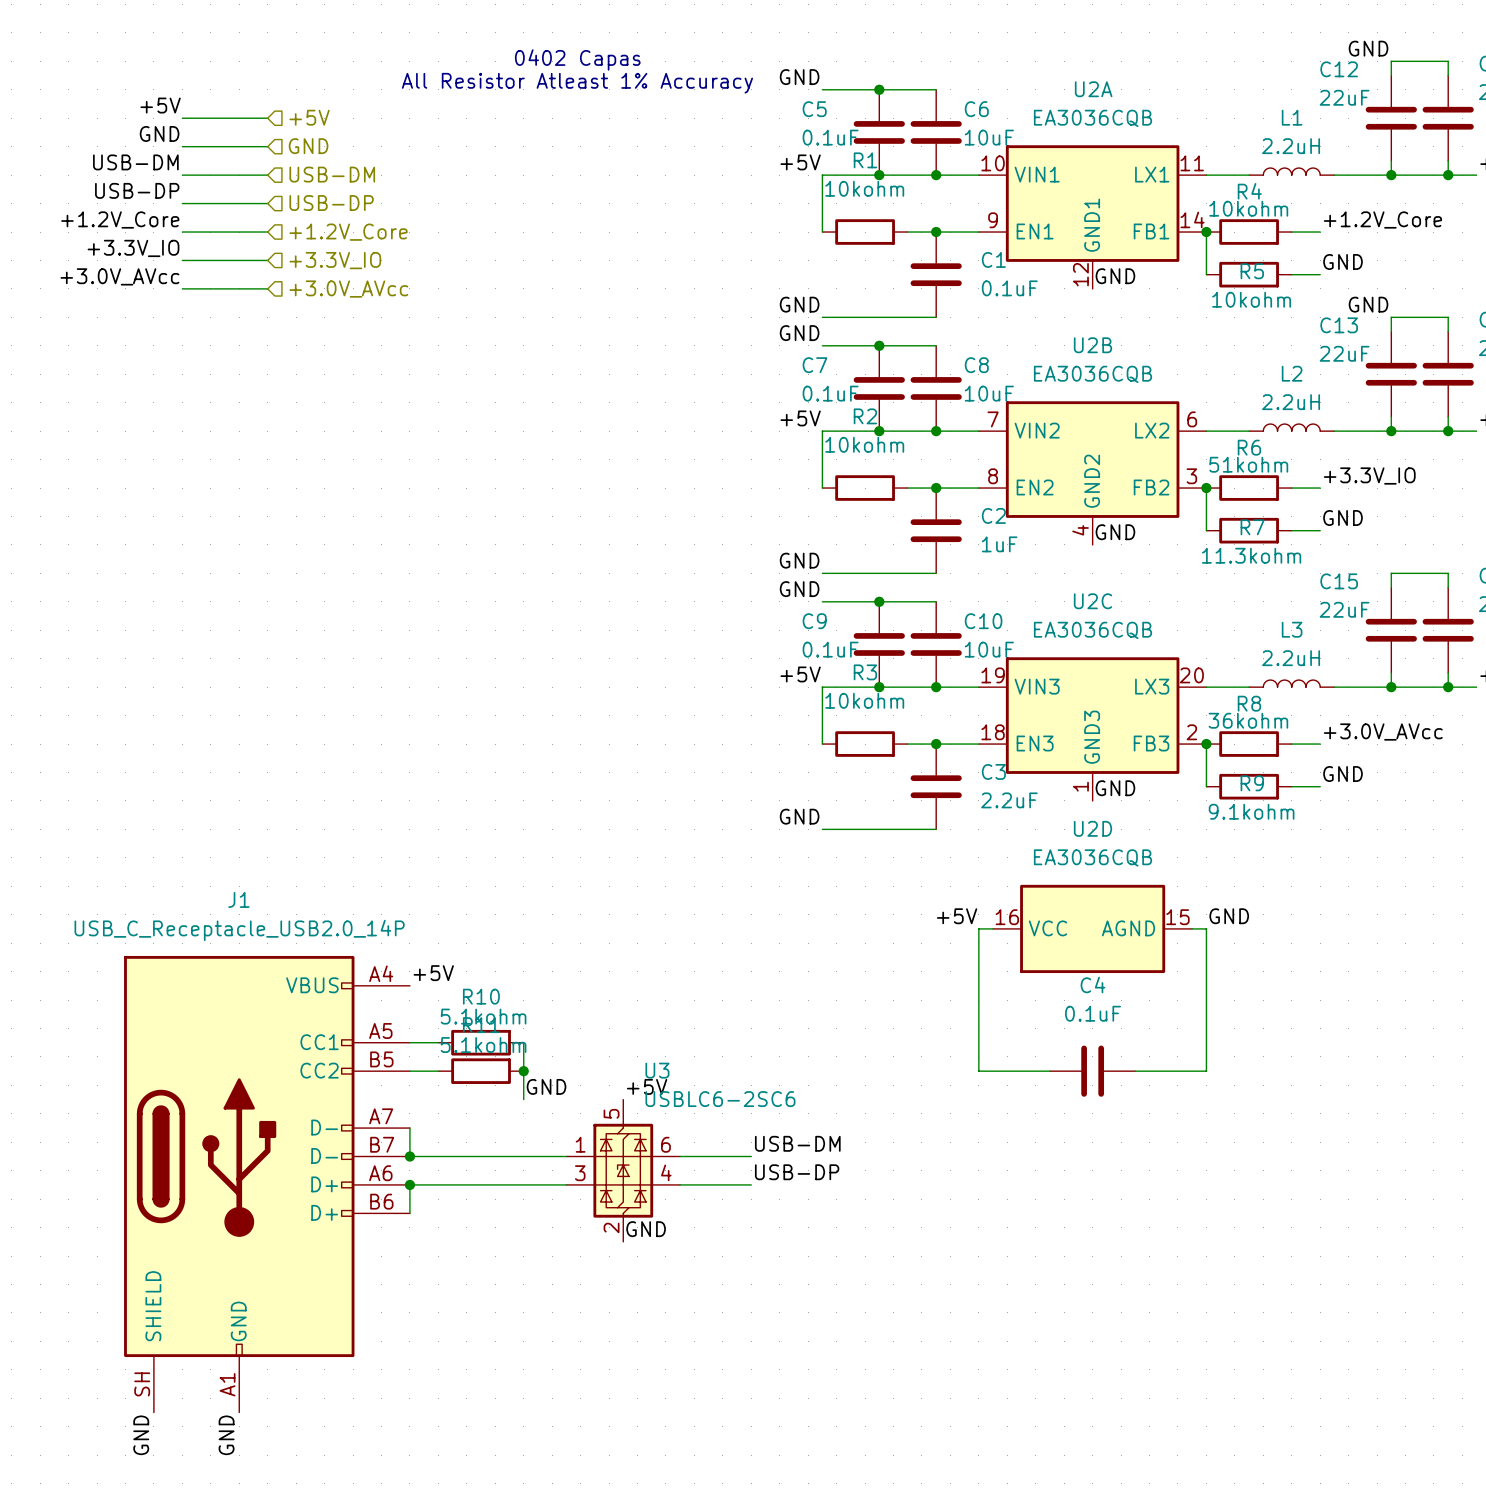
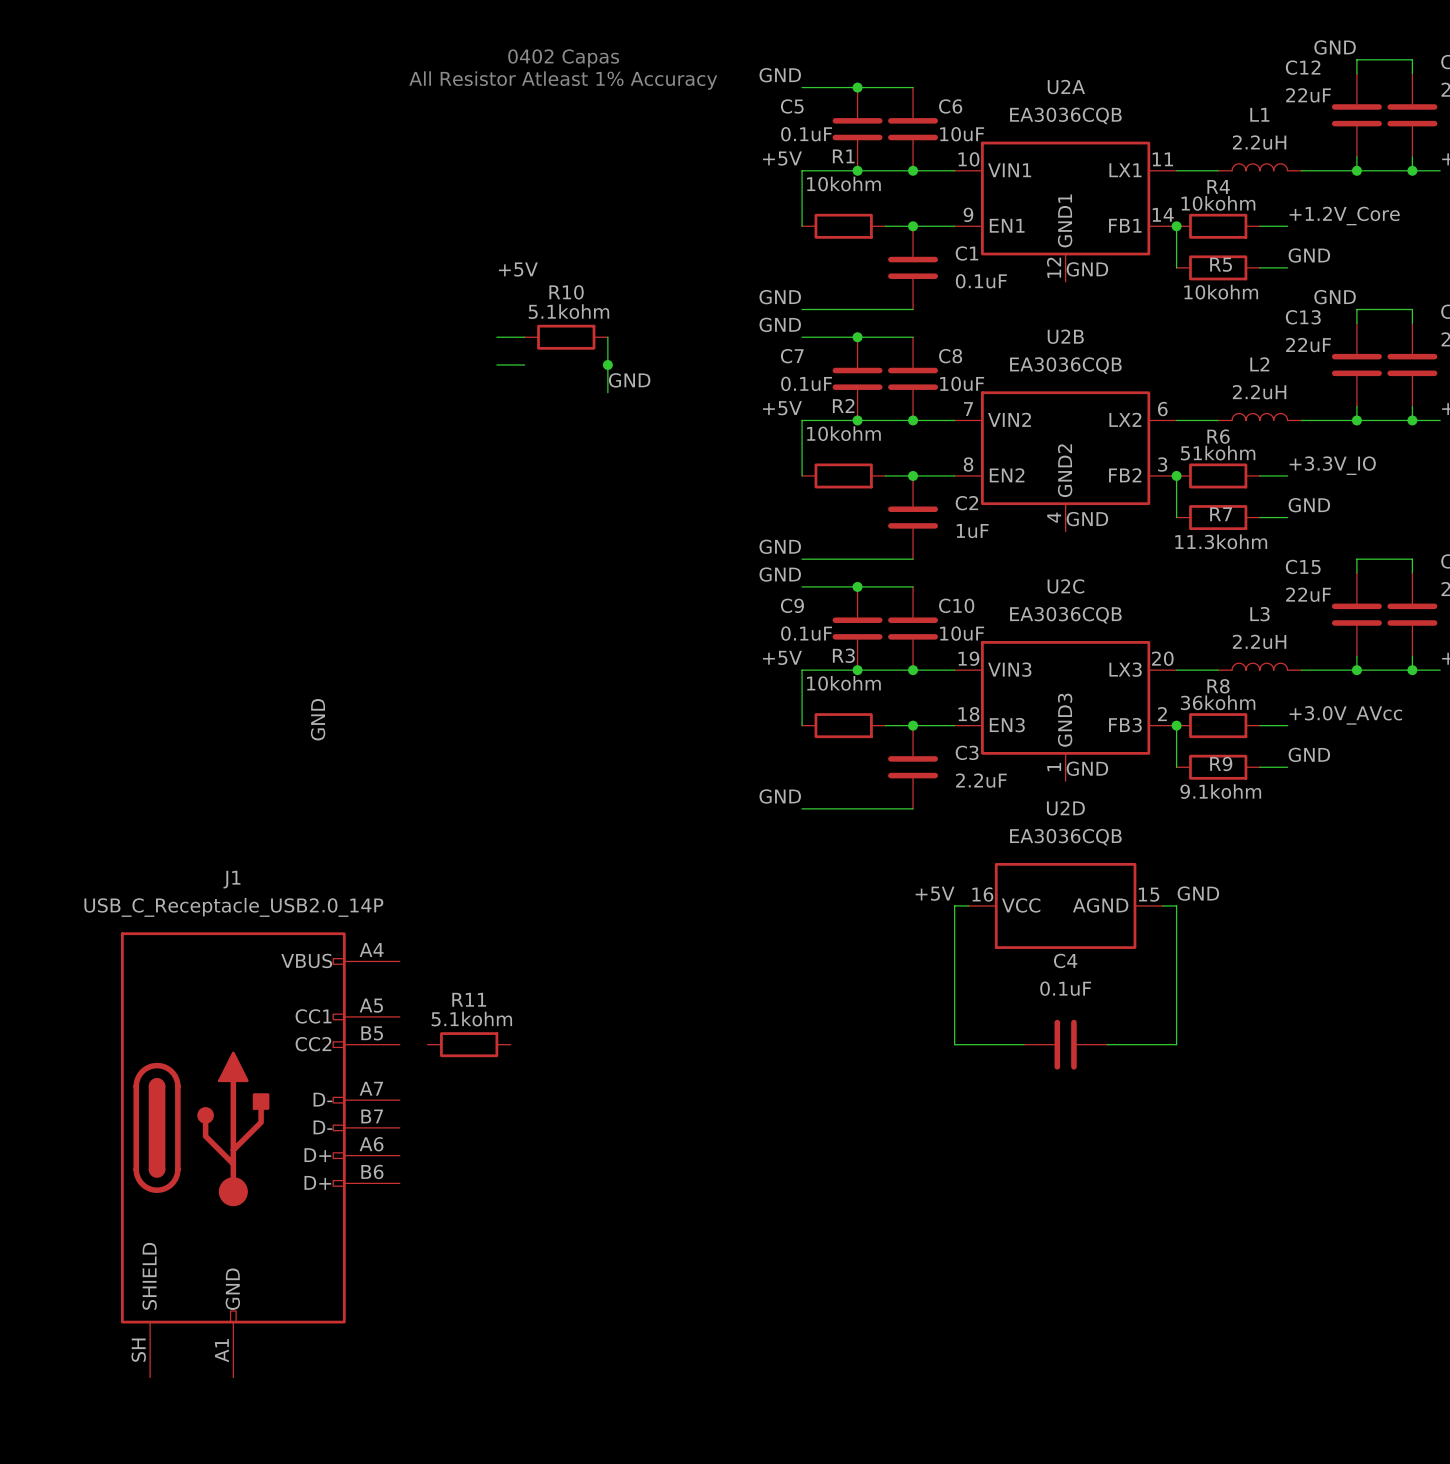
label: +5V (160, 105) -> none
hierarchical label: +5V (309, 117) -> none
wire: (182, 118) (267, 118) -> none
label: GND (159, 133) -> none
wire: (182, 146) (267, 146) -> none
hierarchical label: GND (308, 146) -> none
label: USB-DM (135, 162) -> none
hierarchical label: USB-DM (332, 174) -> none
wire: (182, 175) (267, 175) -> none
label: USB-DP (137, 190) -> none
wire: (182, 203) (267, 203) -> none
hierarchical label: USB-DP (331, 203) -> none
label: +1.2V_Core (120, 219) -> none
wire: (182, 232) (267, 232) -> none
hierarchical label: +1.2V_Core (348, 232) -> none
label: +3.3V_IO (133, 248) -> none
wire: (182, 260) (267, 260) -> none
hierarchical label: +3.3V_IO (335, 260) -> none
label: +3.0V_AVcc (119, 276) -> none
label: none -> +5V (518, 269)
wire: (182, 288) (267, 288) -> none
hierarchical label: +3.0V_AVcc (348, 289) -> none
wire: none -> (496, 337) (524, 337)
wire: none -> (607, 337) (607, 392)
wire: none -> (496, 364) (524, 364)
junction: none -> (607, 364)
label: none -> GND (629, 380)
label: none -> GND (318, 719)
label: +5V (433, 973) -> none
wire: (409, 1042) (438, 1042) -> none
R10 position: (481, 1042) -> (566, 337)
wire: (523, 1042) (523, 1099) -> none
wire: (409, 1071) (438, 1071) -> none
junction: (523, 1071) -> none
label: GND (546, 1086) -> none
label: +5V (647, 1086) -> none
wire: (409, 1128) (409, 1156) (566, 1156) -> none
label: USB-DM (797, 1143) -> none
junction: (409, 1156) -> none
wire: (680, 1156) (751, 1156) -> none
U3: USBLC6-2SC6 (623, 1170) -> none
label: USB-DP (797, 1172) -> none
junction: (409, 1184) -> none
wire: (566, 1184) (409, 1184) (409, 1213) -> none
wire: (680, 1184) (751, 1184) -> none
label: GND (646, 1229) -> none
label: GND (141, 1435) -> none
label: GND (226, 1435) -> none

